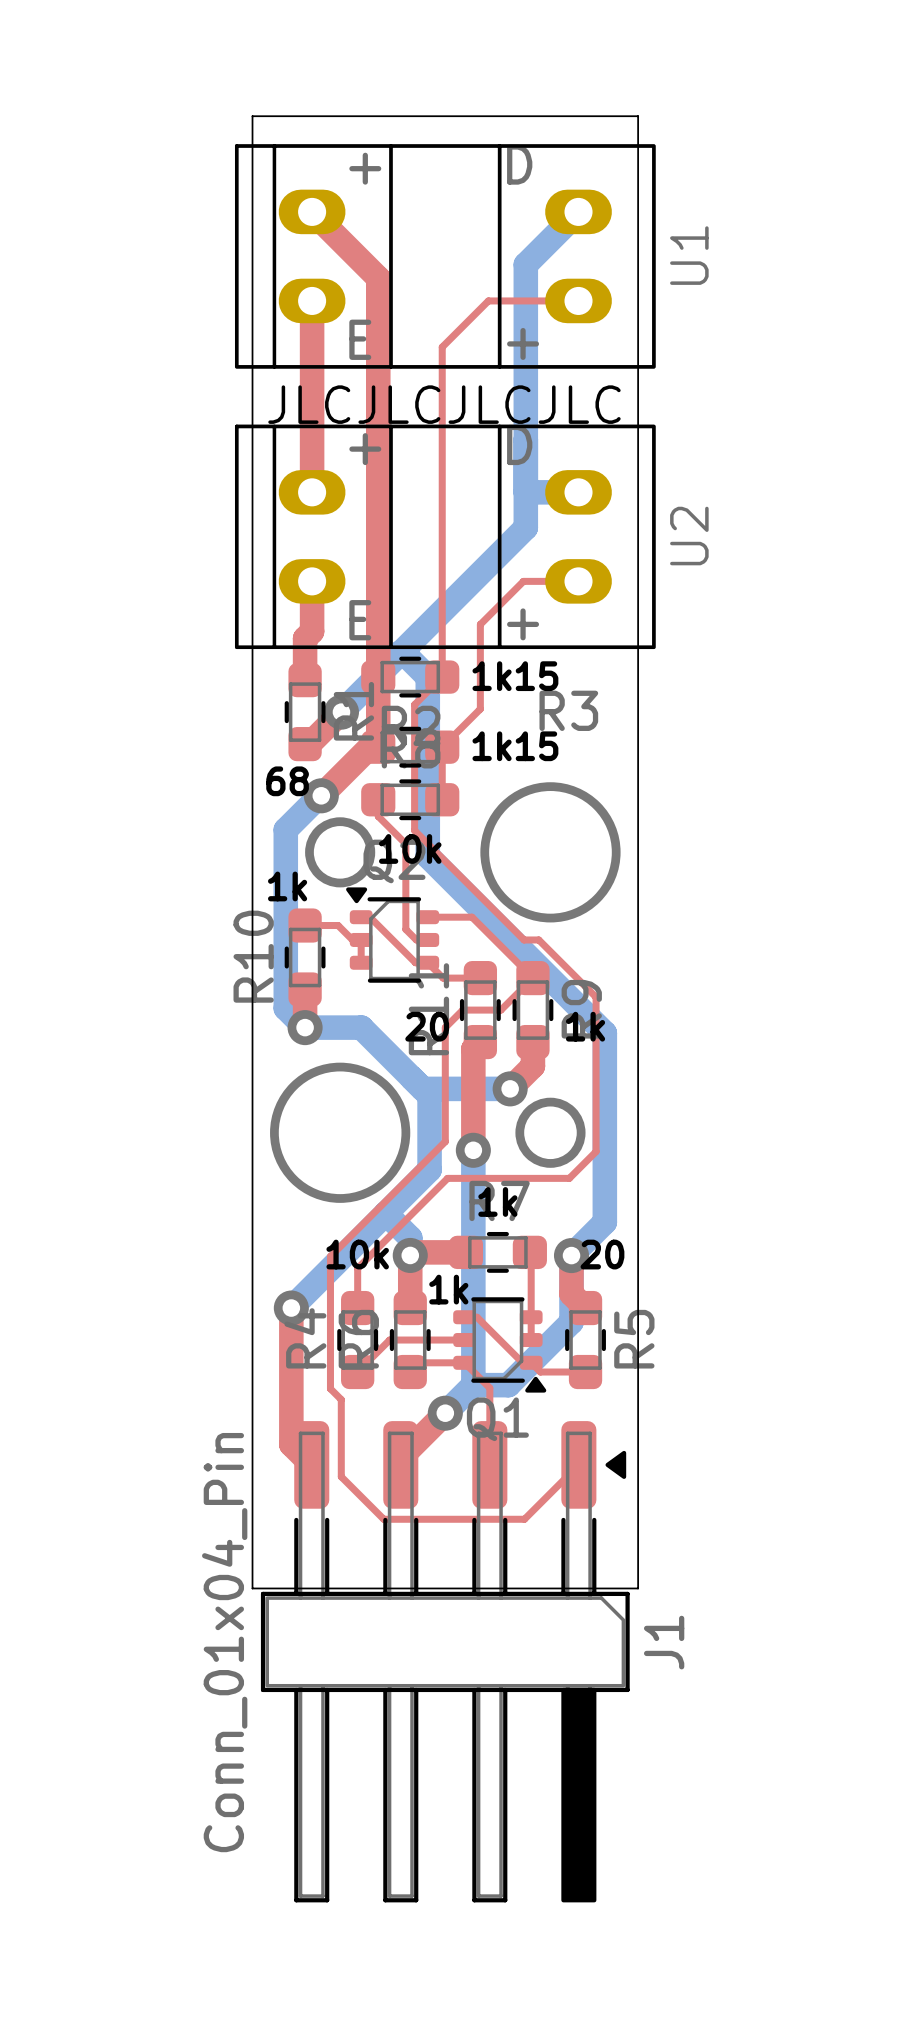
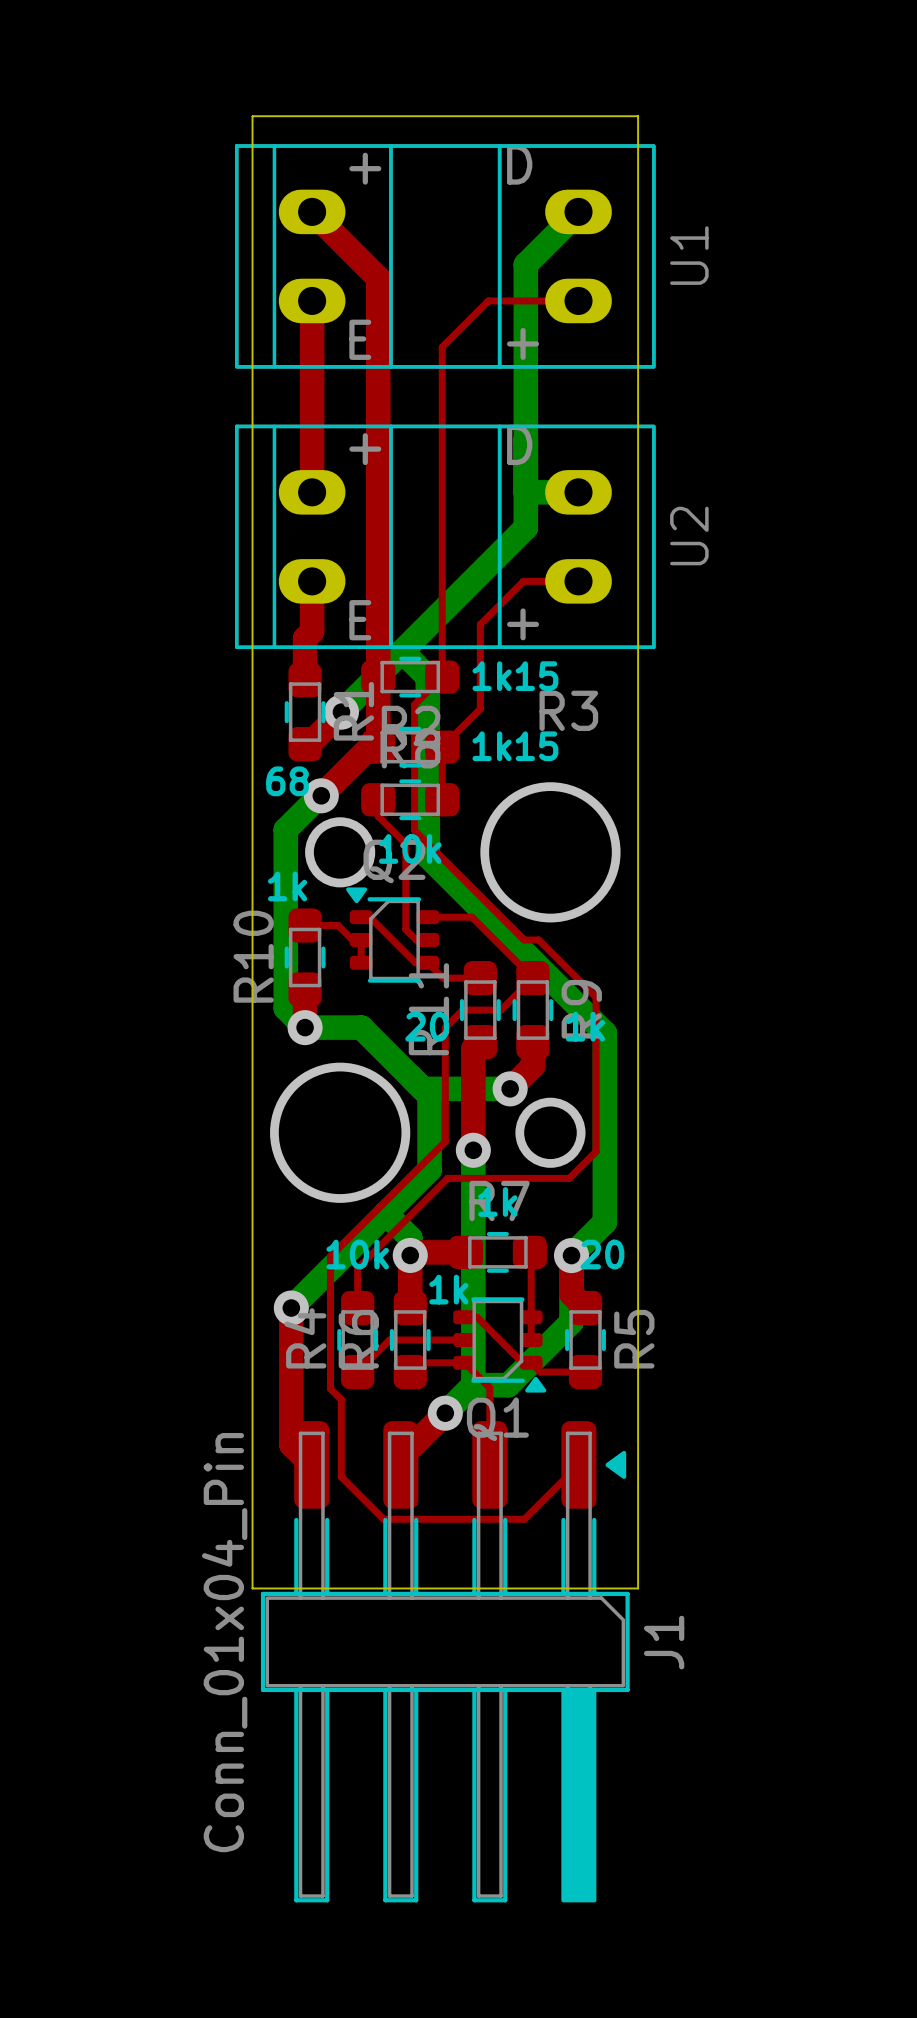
text: JLCJLCJLCJLC (444, 404) -> none

